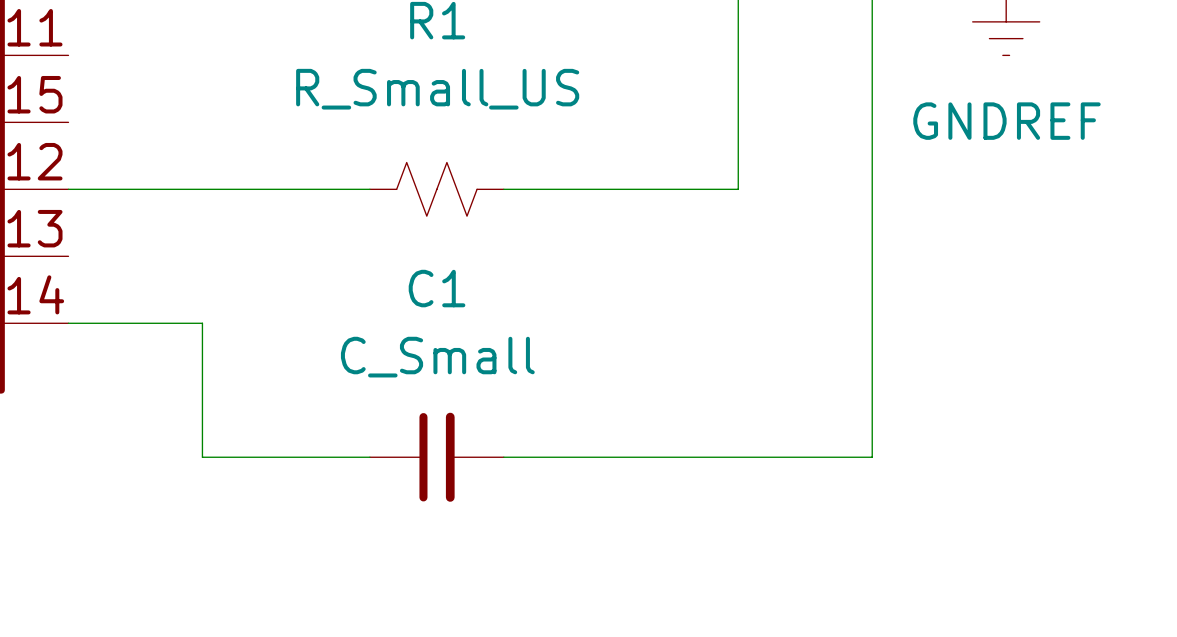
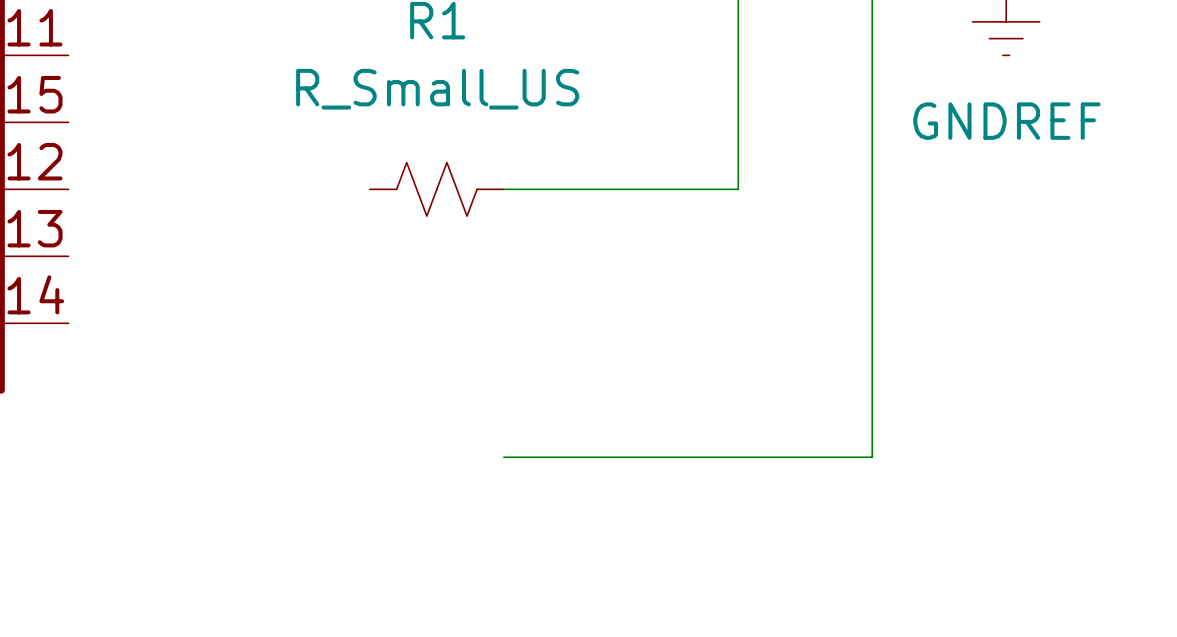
wire: (68, 189) (369, 189) -> none
wire: (68, 323) (202, 323) (202, 457) (369, 457) -> none
C1: C_Small (436, 457) -> none

